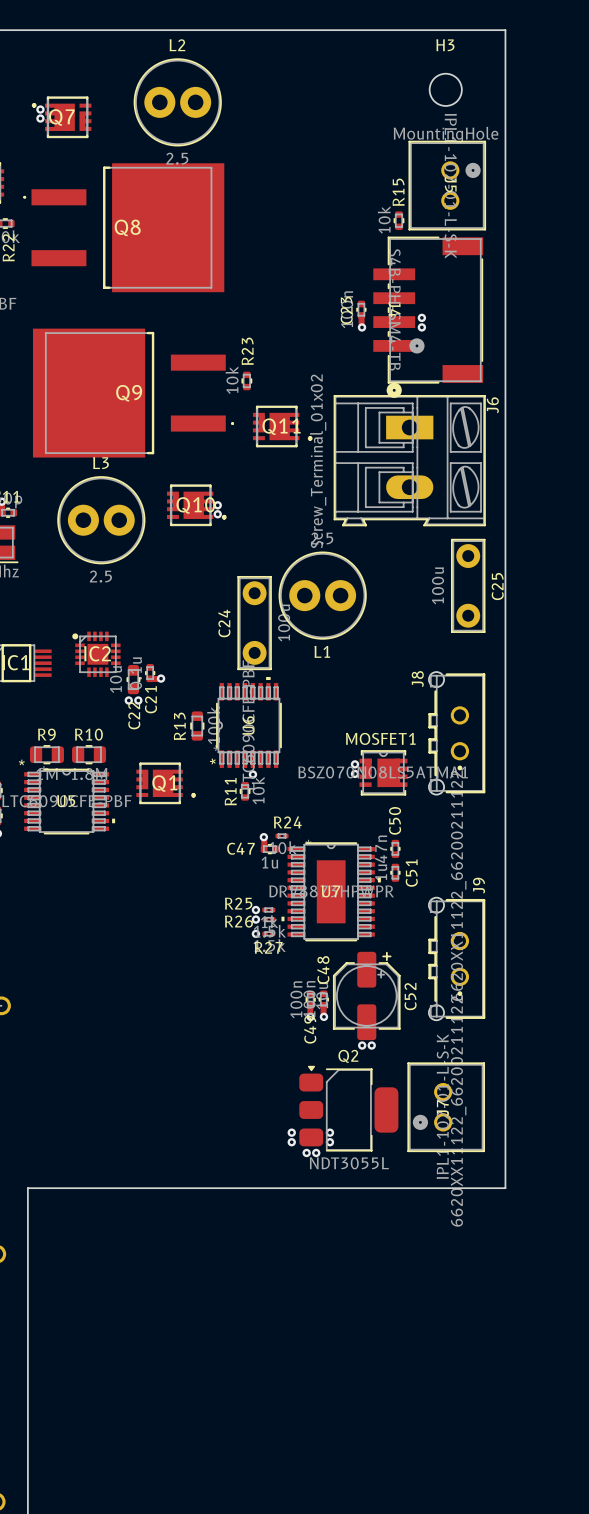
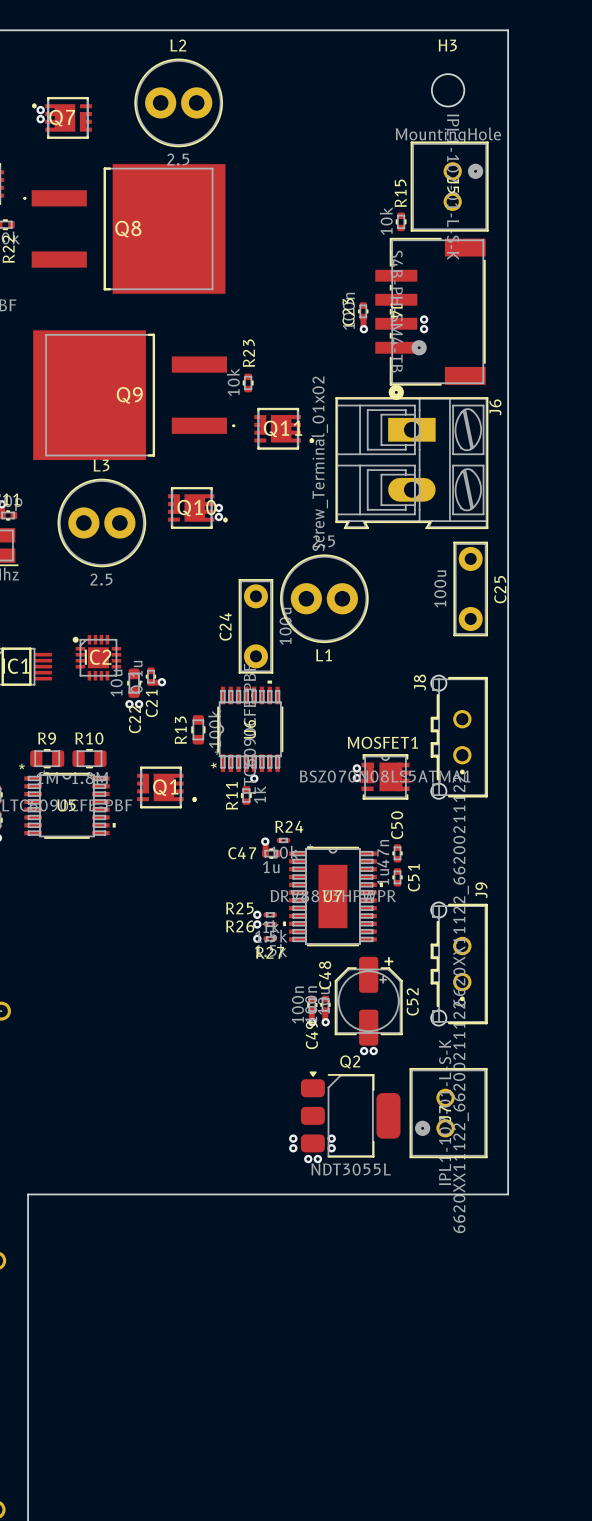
R11 value: 10k (258, 790) -> 1k (259, 794)

